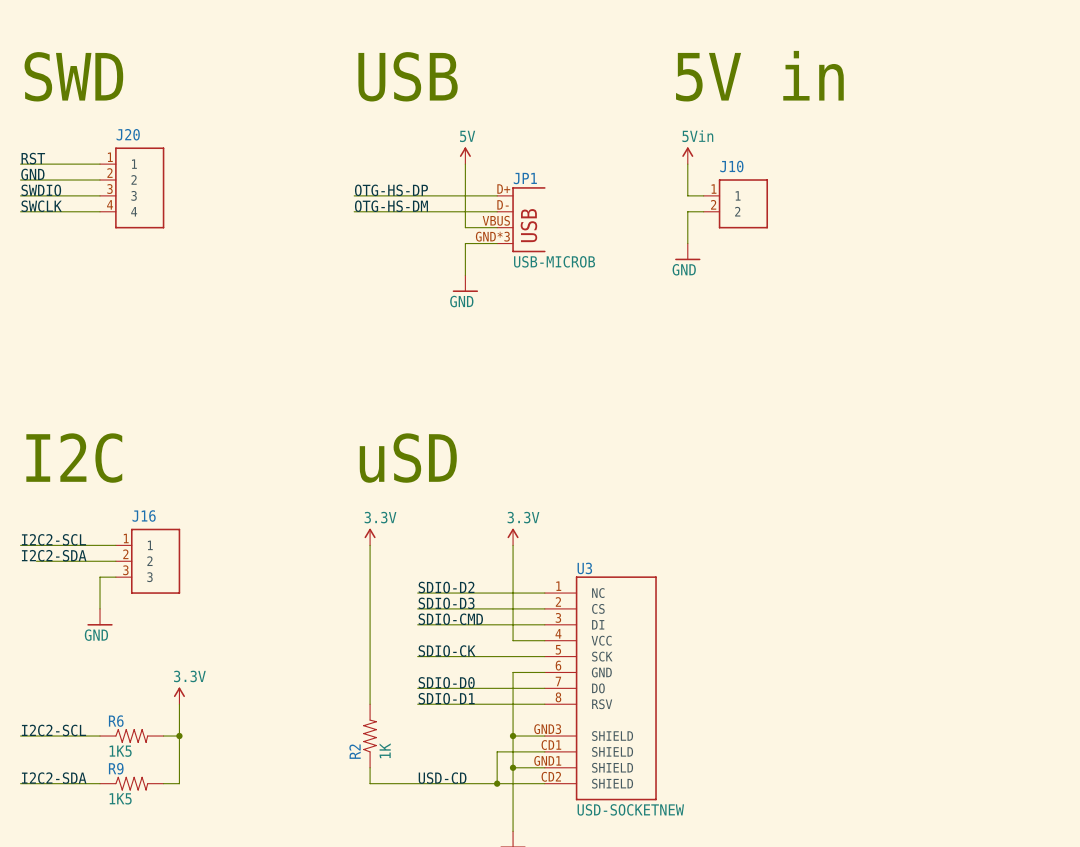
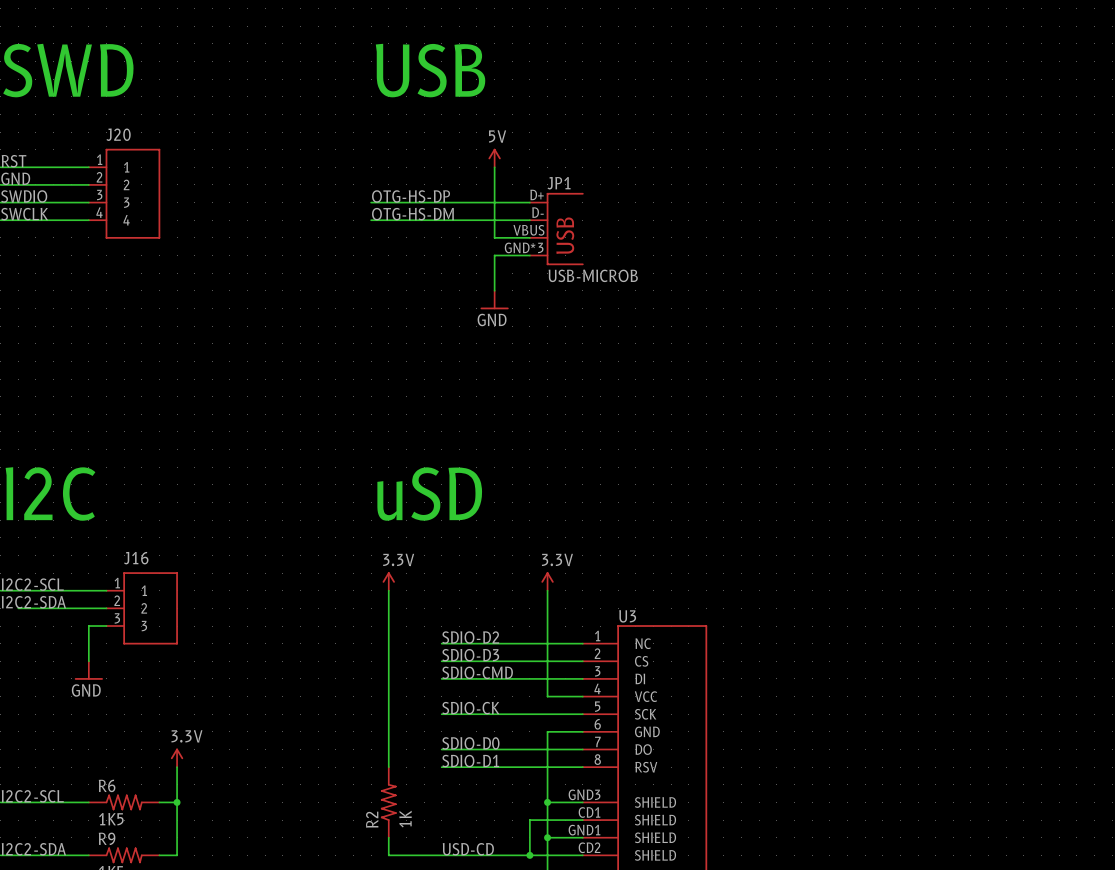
text: 5V in (759, 76) -> none
power symbol: 5Vin (687, 155) -> none
wire: (687, 164) (687, 195) (703, 195) -> none
J10: (735, 203) -> none
wire: (703, 211) (687, 211) (687, 243) -> none
power symbol: GND (687, 251) -> none

